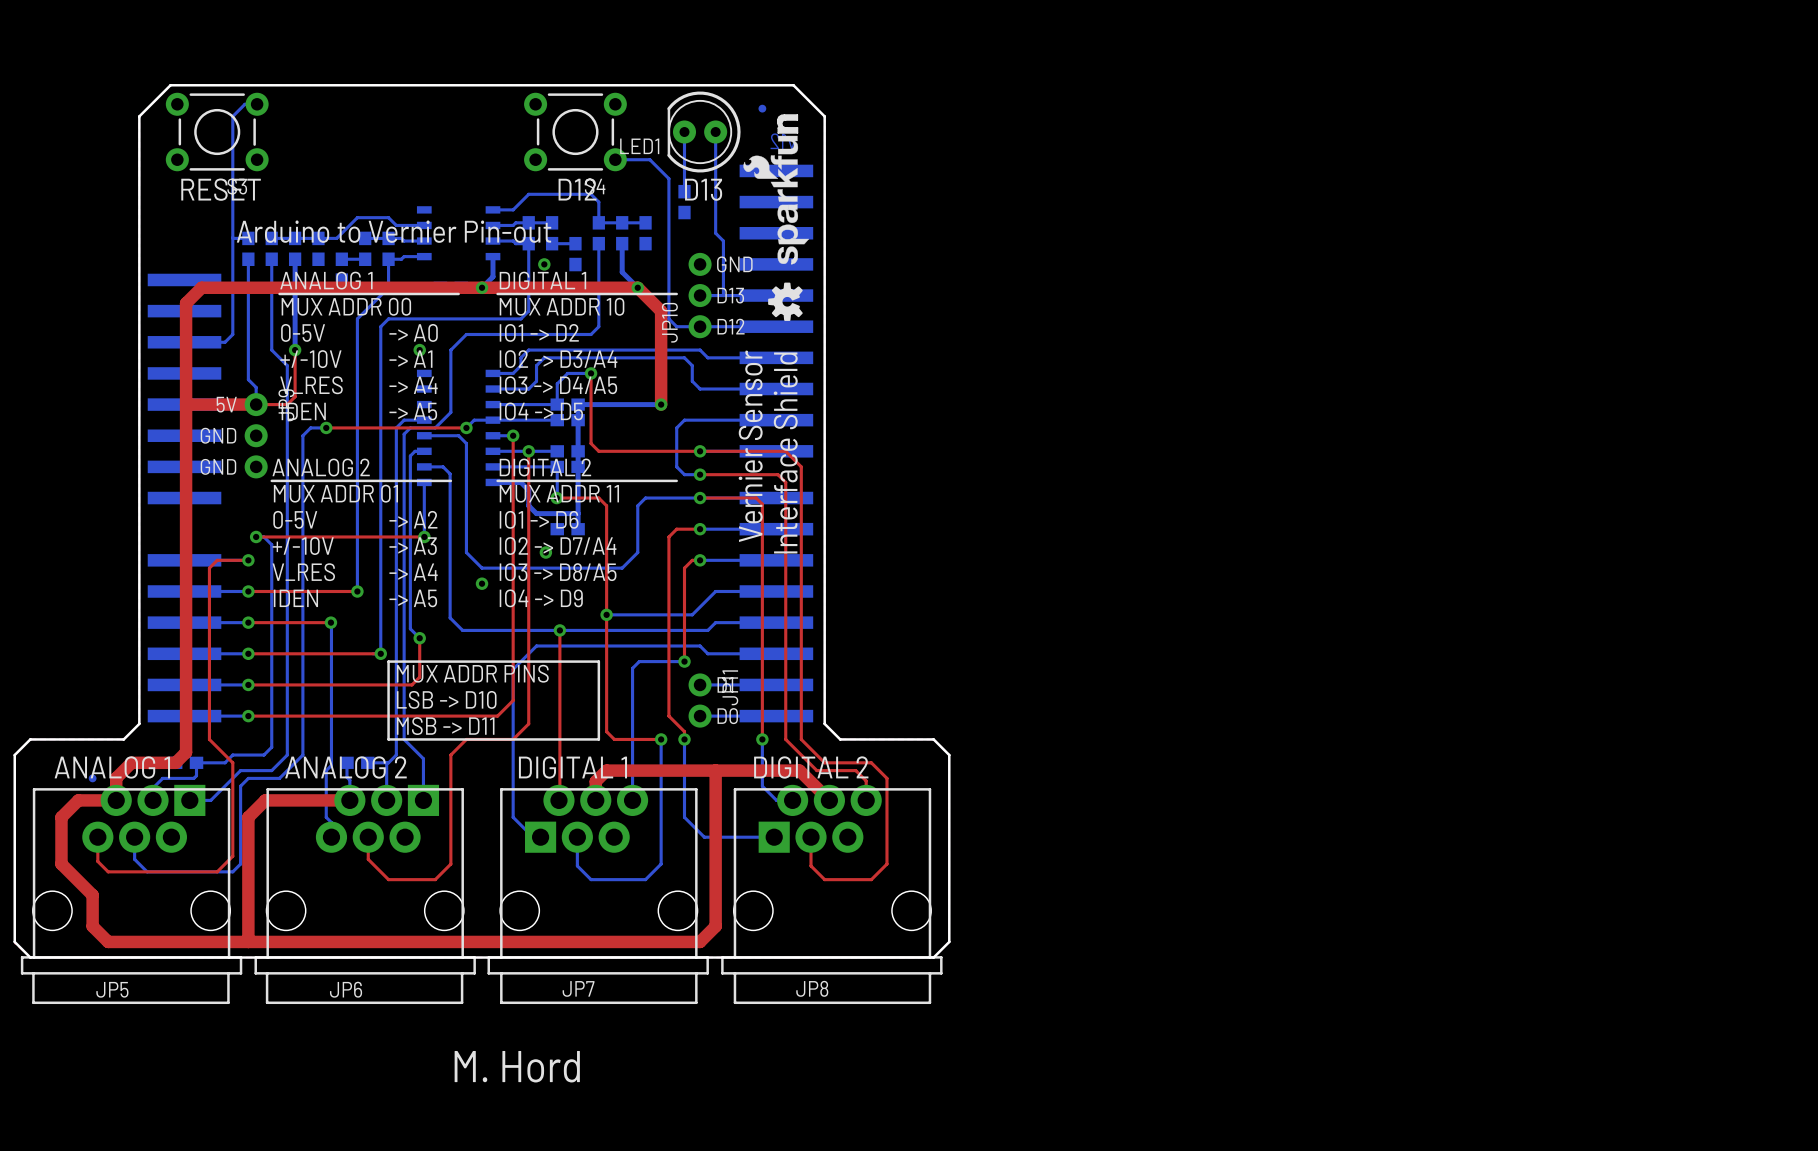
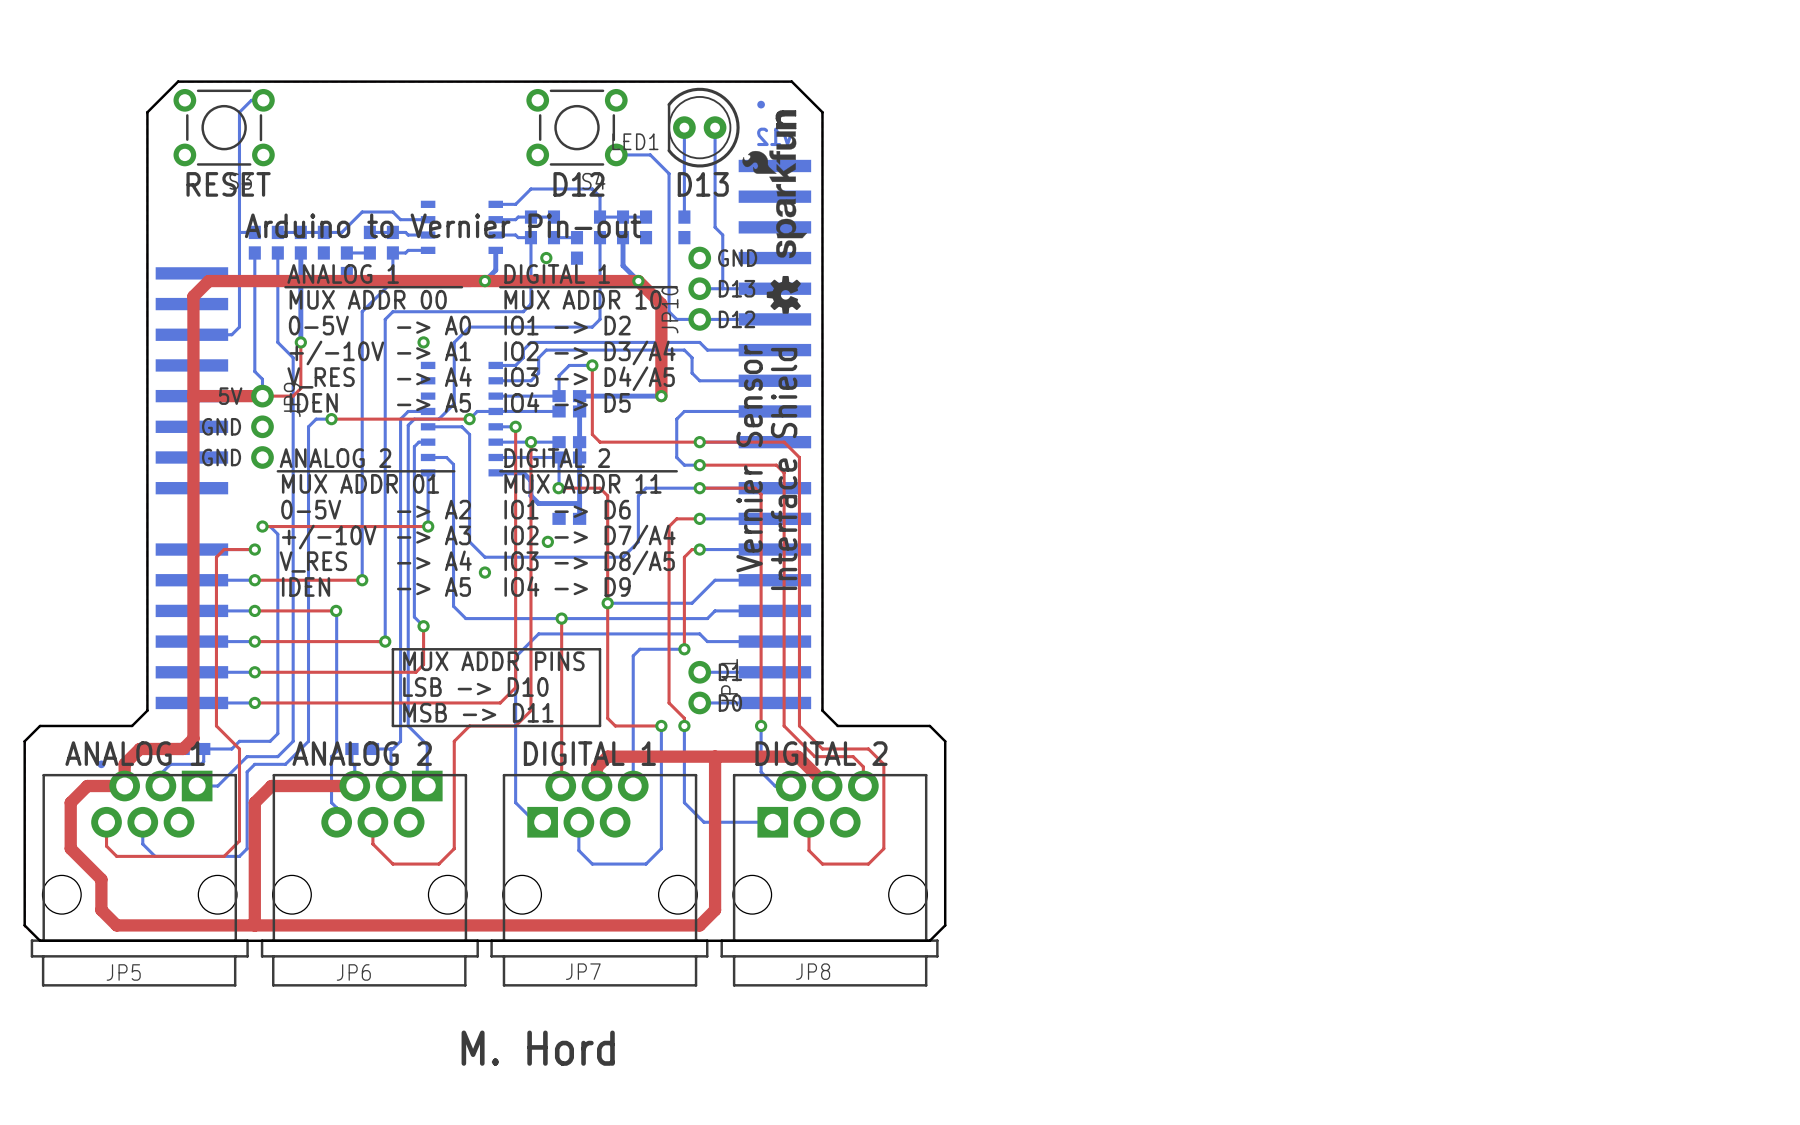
bottom track: none -> (684, 186) (684, 217)
part position: (684, 202) -> (684, 227)

